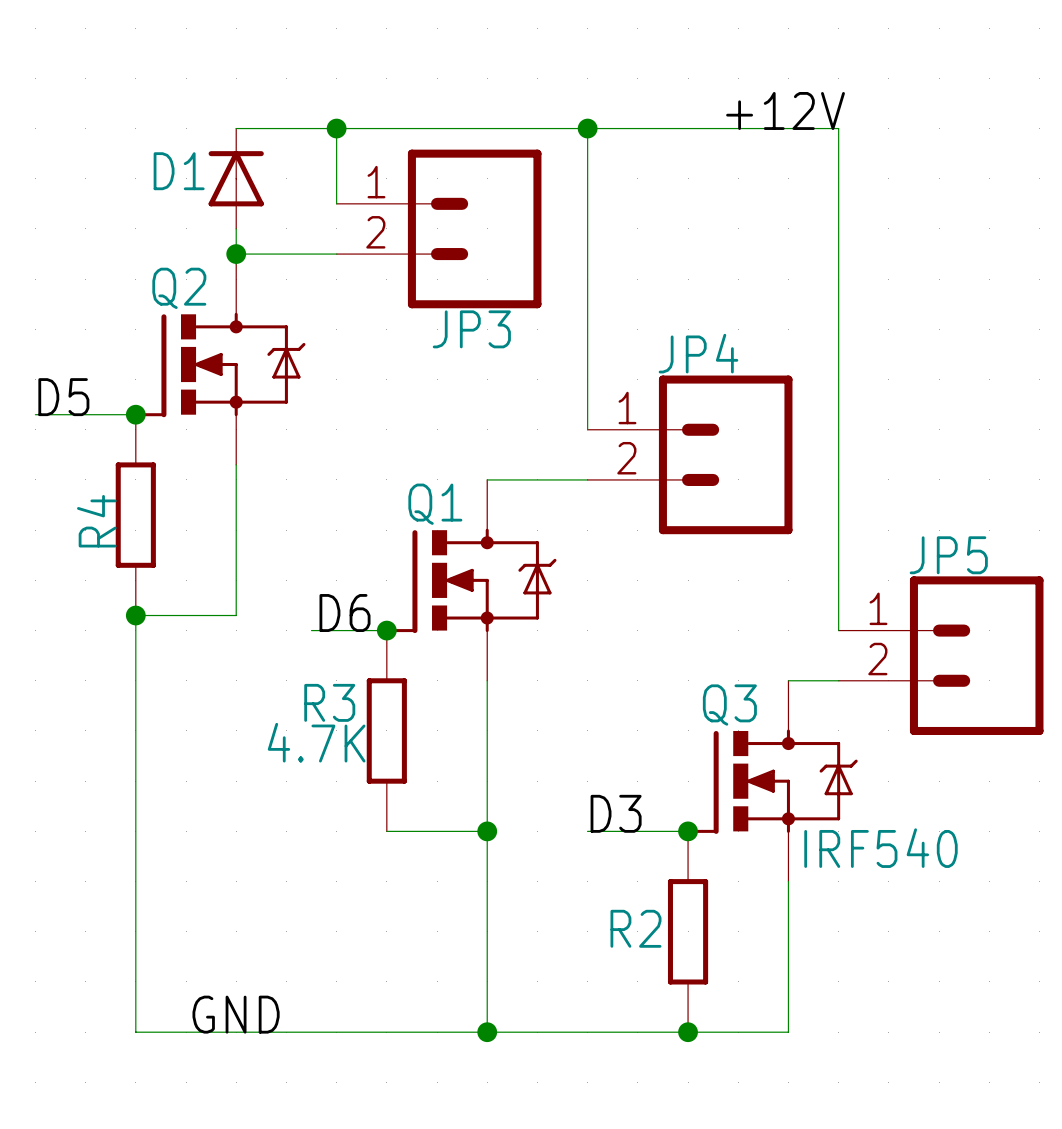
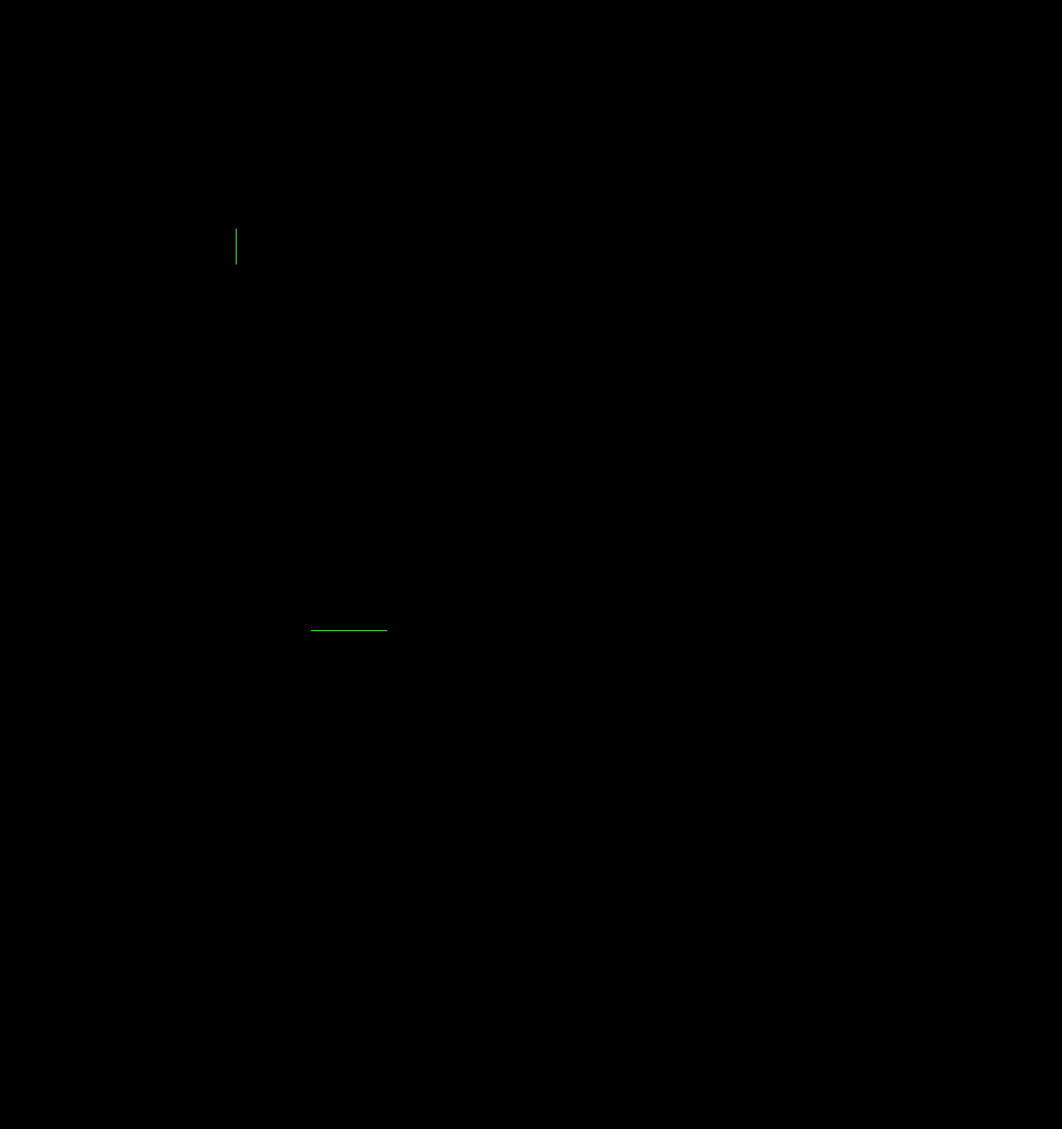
label: +12V (785, 110) -> none
wire: (236, 128) (838, 128) (838, 630) -> none
wire: (336, 128) (336, 203) -> none
junction: (336, 128) -> none
wire: (587, 128) (587, 429) -> none
junction: (587, 128) -> none
D1: (236, 178) -> none
JP3: (439, 228) -> none
wire: (236, 254) (336, 254) -> none
junction: (236, 254) -> none
Q2: (219, 364) -> none
label: D5 (63, 397) -> none
wire: (35, 414) (135, 414) -> none
junction: (135, 414) -> none
JP4: (690, 454) -> none
wire: (236, 464) (236, 615) (135, 615) (135, 1032) (788, 1032) (788, 881) -> none
wire: (487, 479) (587, 479) -> none
R4: (135, 515) -> none
Q1: (470, 580) -> none
label: D6 (345, 613) -> none
junction: (135, 615) -> none
junction: (386, 630) -> none
JP5: (941, 655) -> none
wire: (487, 680) (487, 1032) -> none
wire: (788, 680) (838, 680) -> none
R3: 4.7K (386, 730) -> none
Q3: IRF540 (772, 781) -> none
label: D3 (616, 813) -> none
wire: (386, 831) (487, 831) -> none
junction: (487, 831) -> none
wire: (587, 831) (688, 831) -> none
junction: (688, 831) -> none
R2: (688, 931) -> none
label: GND (236, 1014) -> none
junction: (487, 1032) -> none
junction: (688, 1032) -> none

